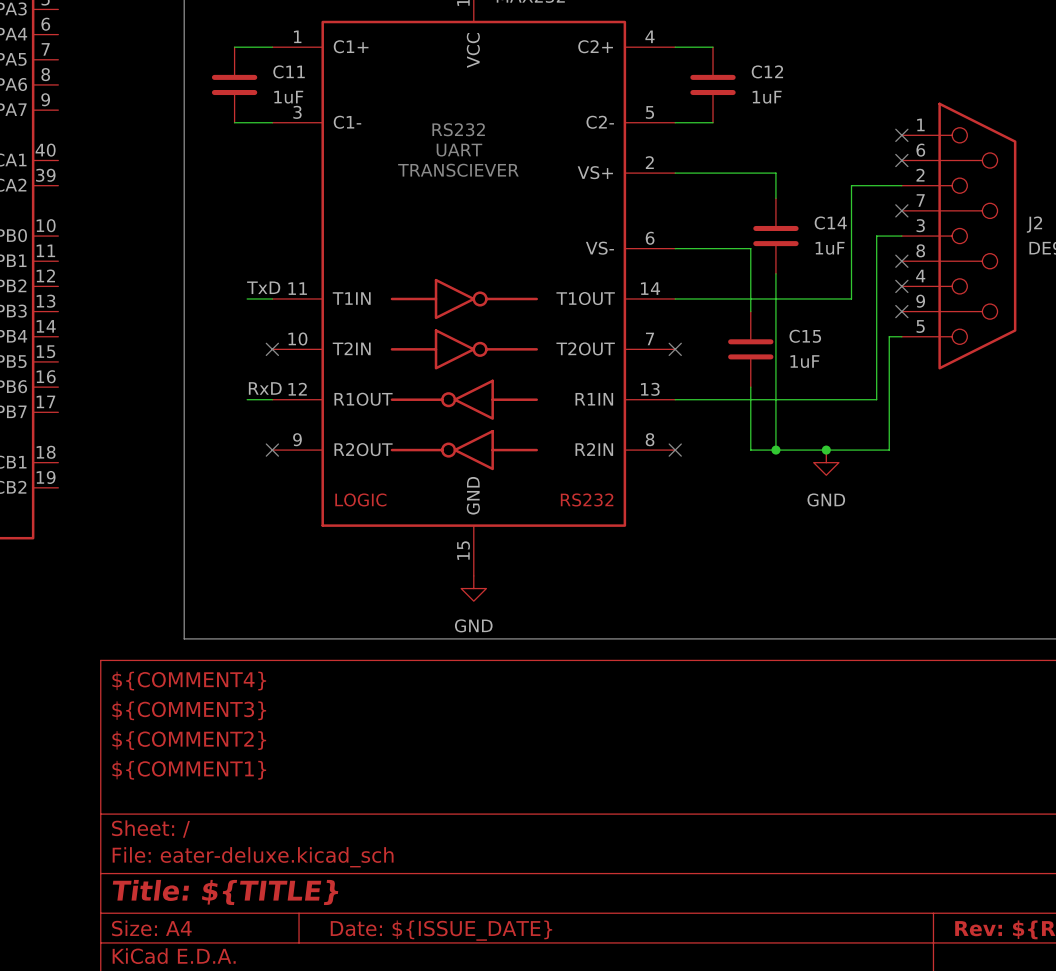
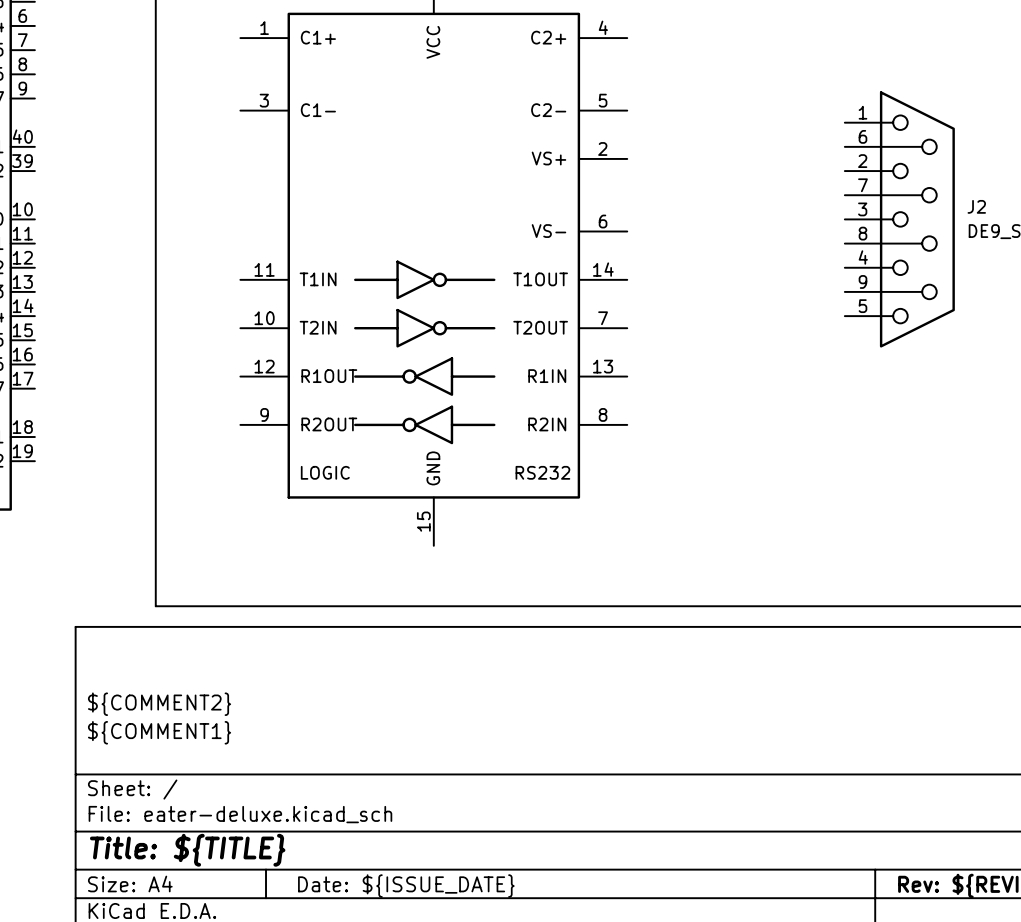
wire: (234, 47) (272, 47) -> none
wire: (675, 47) (713, 47) -> none
C11: 1uF (234, 84) -> none
C12: 1uF (713, 84) -> none
wire: (234, 122) (272, 122) -> none
wire: (675, 122) (713, 122) -> none
text: RS232 (458, 129) -> none
no-connect mark: (901, 135) -> none
text: UART (459, 150) -> none
no-connect mark: (901, 160) -> none
text: TRANSCIEVER (458, 170) -> none
wire: (675, 173) (775, 173) (775, 198) -> none
wire: (901, 185) (851, 185) (851, 298) (675, 298) -> none
no-connect mark: (901, 210) -> none
C14: 1uF (775, 236) -> none
wire: (901, 236) (876, 236) (876, 399) (675, 399) -> none
wire: (675, 248) (750, 248) (750, 311) -> none
no-connect mark: (901, 261) -> none
wire: (775, 273) (775, 450) -> none
no-connect mark: (901, 286) -> none
label: TxD (263, 287) -> none
wire: (247, 298) (272, 298) -> none
no-connect mark: (901, 311) -> none
wire: (901, 336) (889, 336) (889, 450) (750, 450) (750, 387) -> none
no-connect mark: (272, 349) -> none
no-connect mark: (675, 349) -> none
C15: 1uF (750, 349) -> none
label: RxD (265, 388) -> none
wire: (247, 399) (272, 399) -> none
no-connect mark: (272, 450) -> none
no-connect mark: (675, 450) -> none
junction: (775, 450) -> none
junction: (826, 450) -> none
power symbol: GND (826, 462) -> none
power symbol: GND (473, 588) -> none
title block: ${COMMENT4} (189, 681) -> none
title block: ${COMMENT3} (189, 710) -> none

